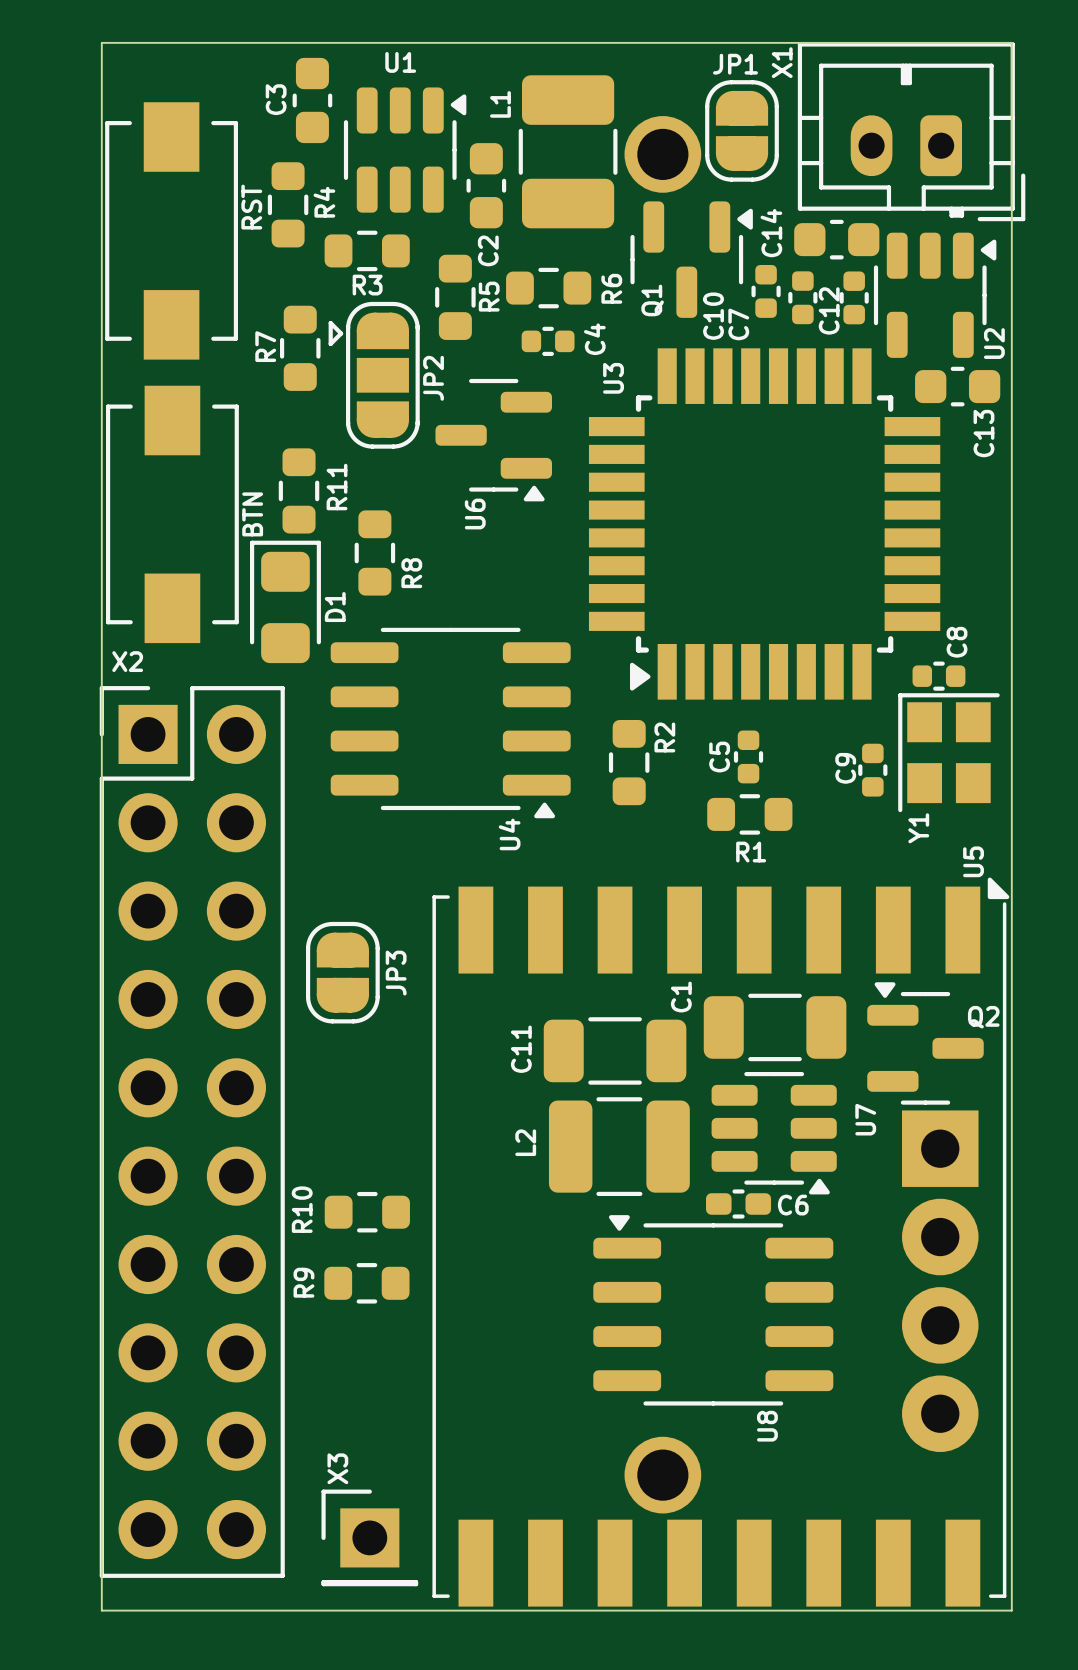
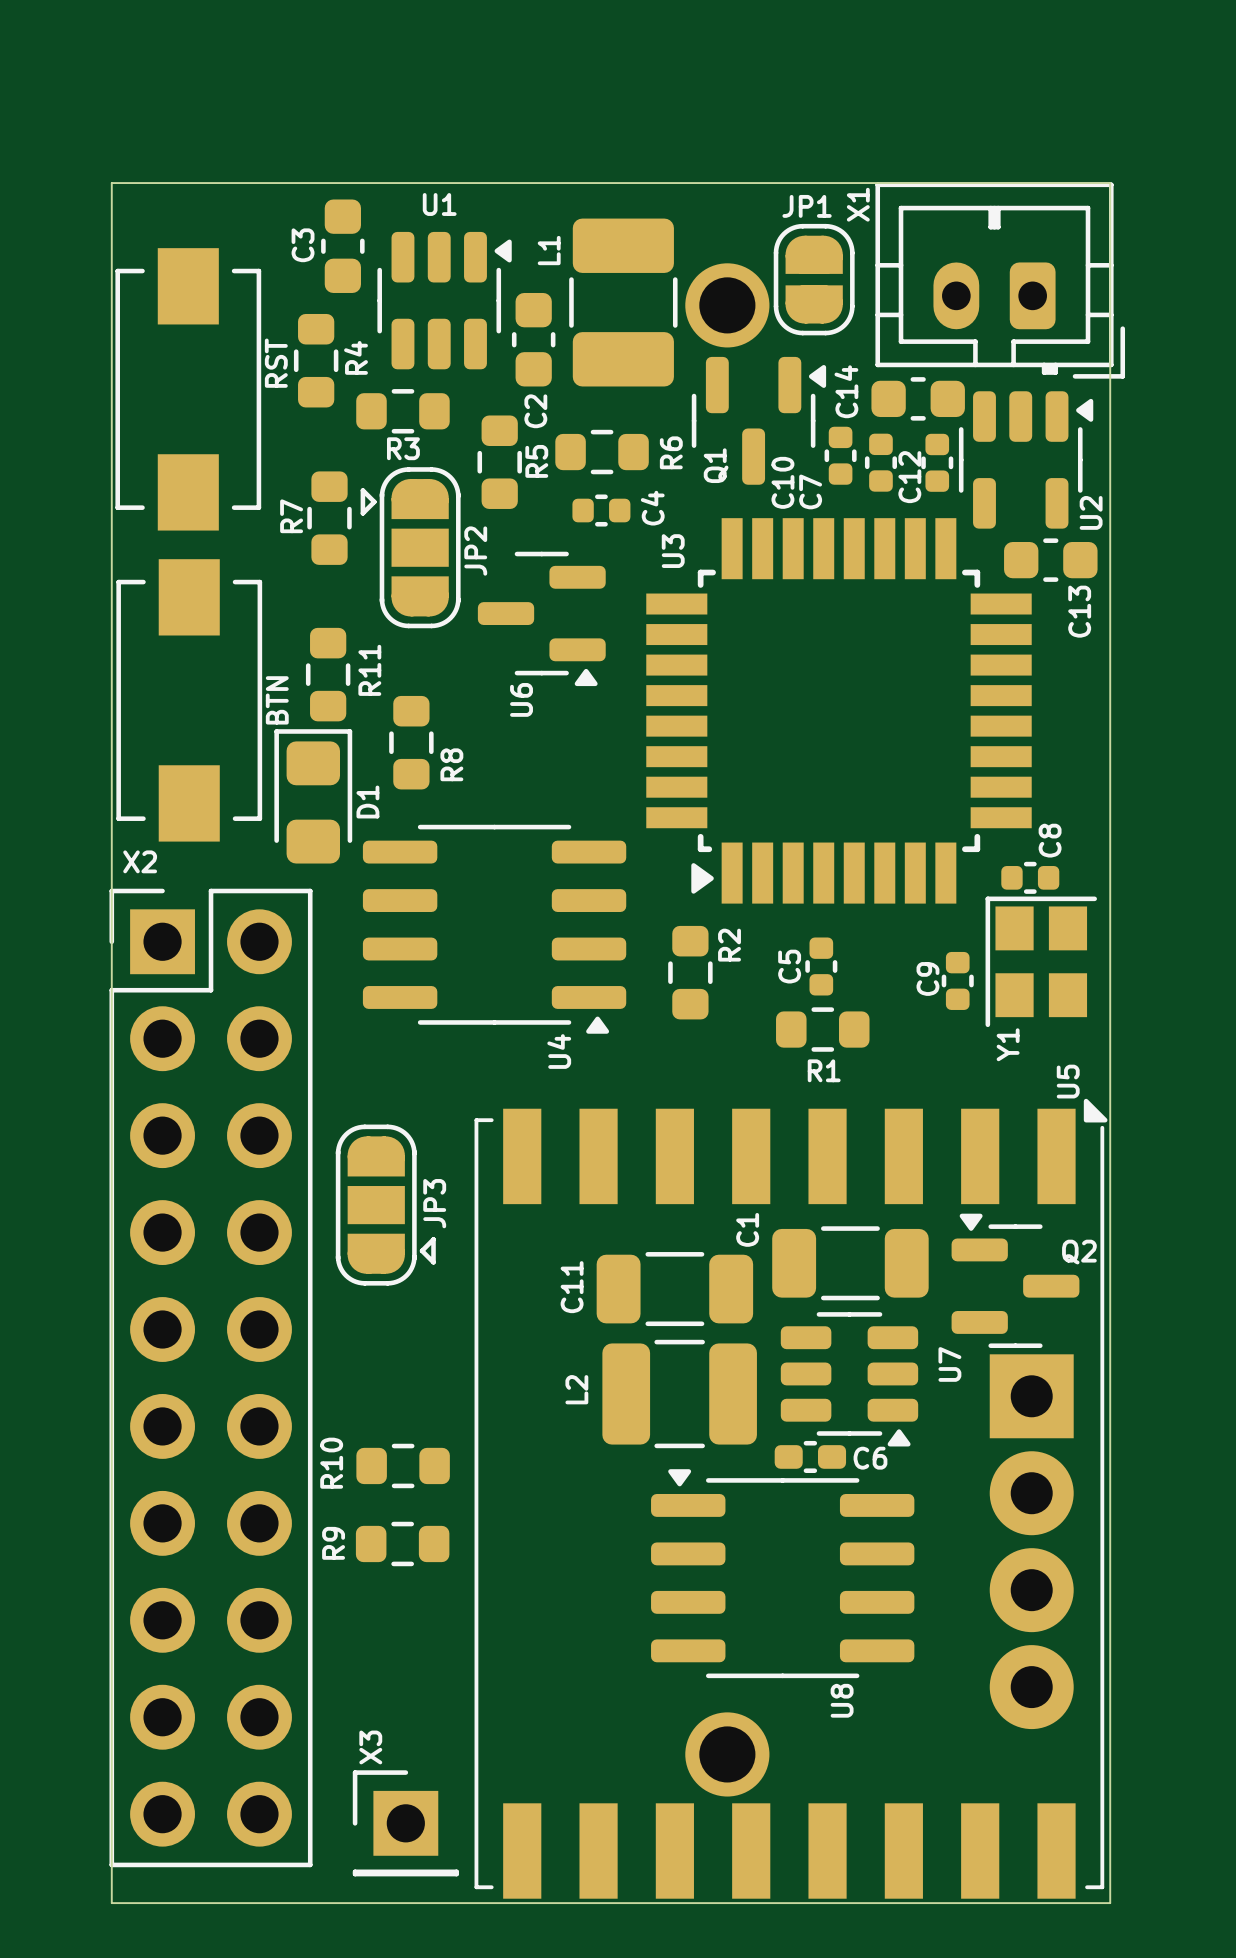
JP3 footprint: [306, 921, 380, 1024] -> [335, 1124, 436, 1286]

